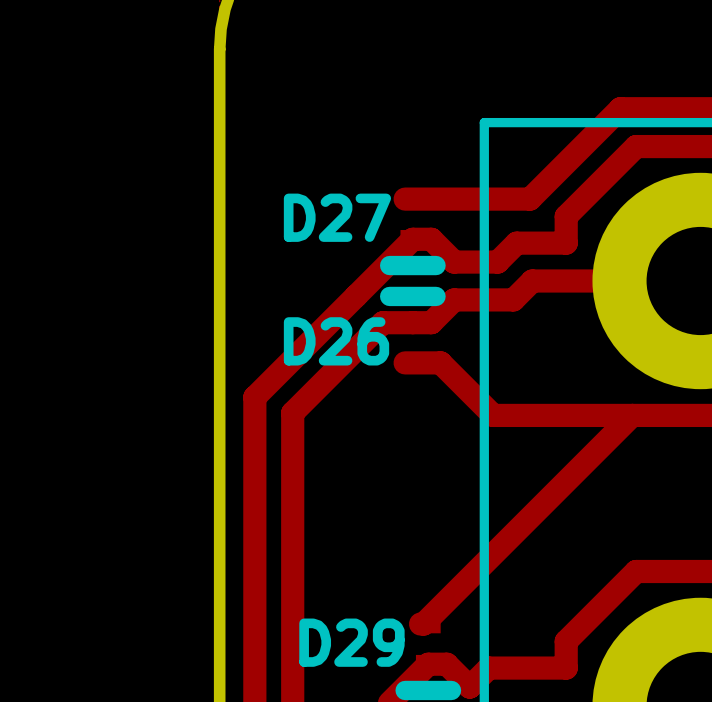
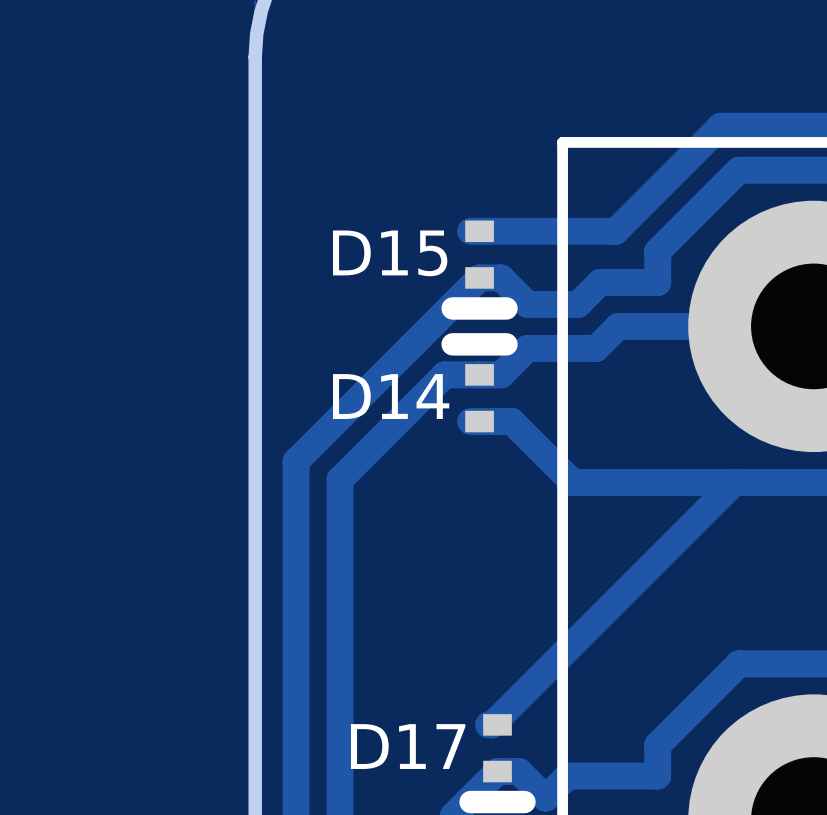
D27 name: D27 (337, 217) -> D15 (390, 253)
D26 name: D26 (336, 341) -> D14 (391, 396)
D29 name: D29 (351, 642) -> D17 (408, 746)

